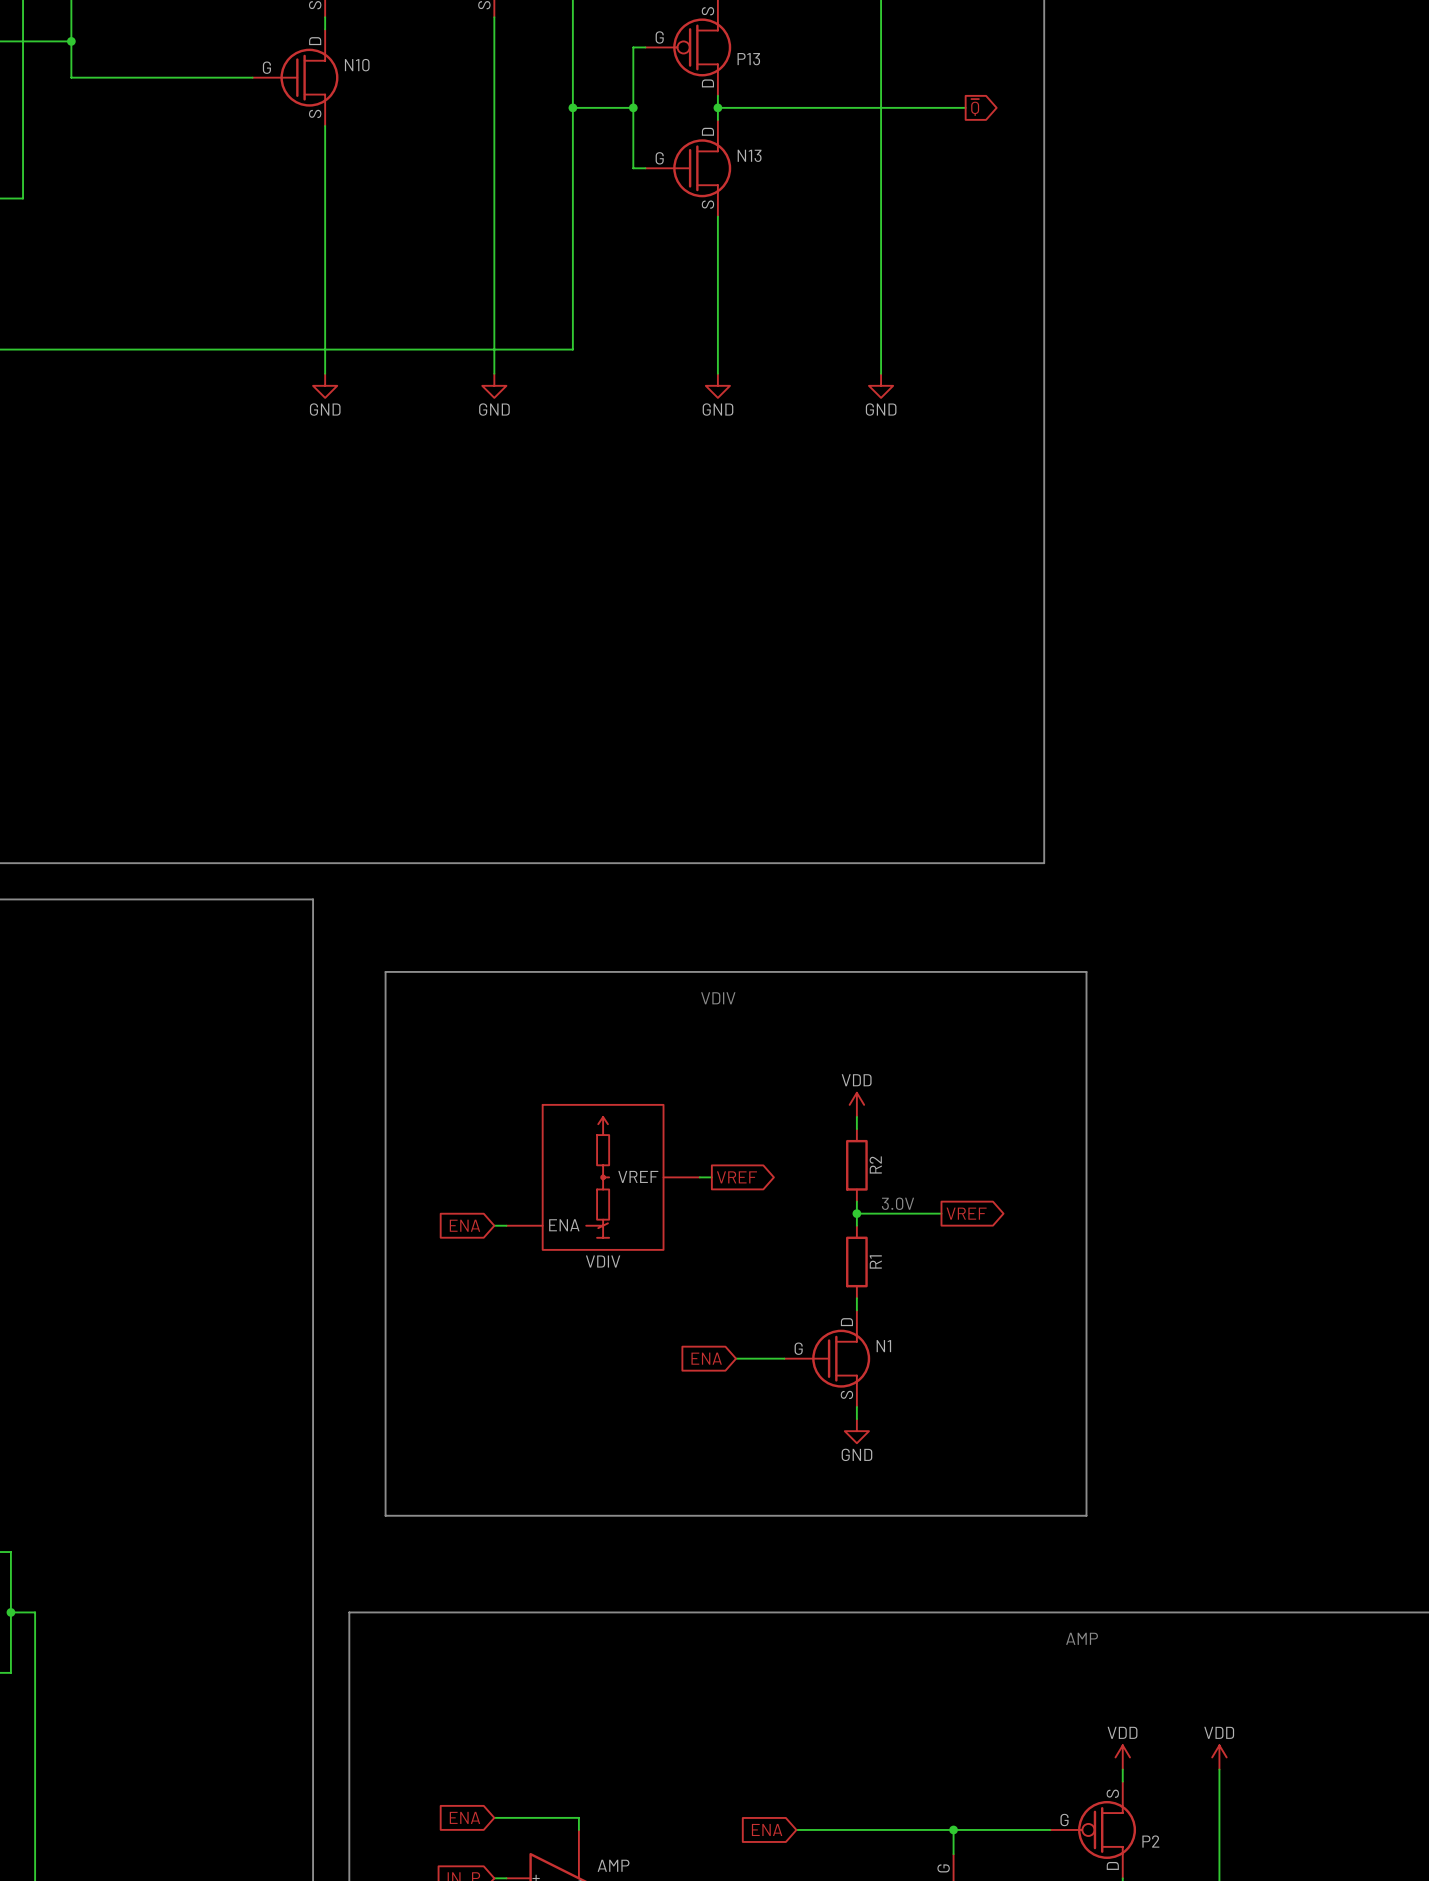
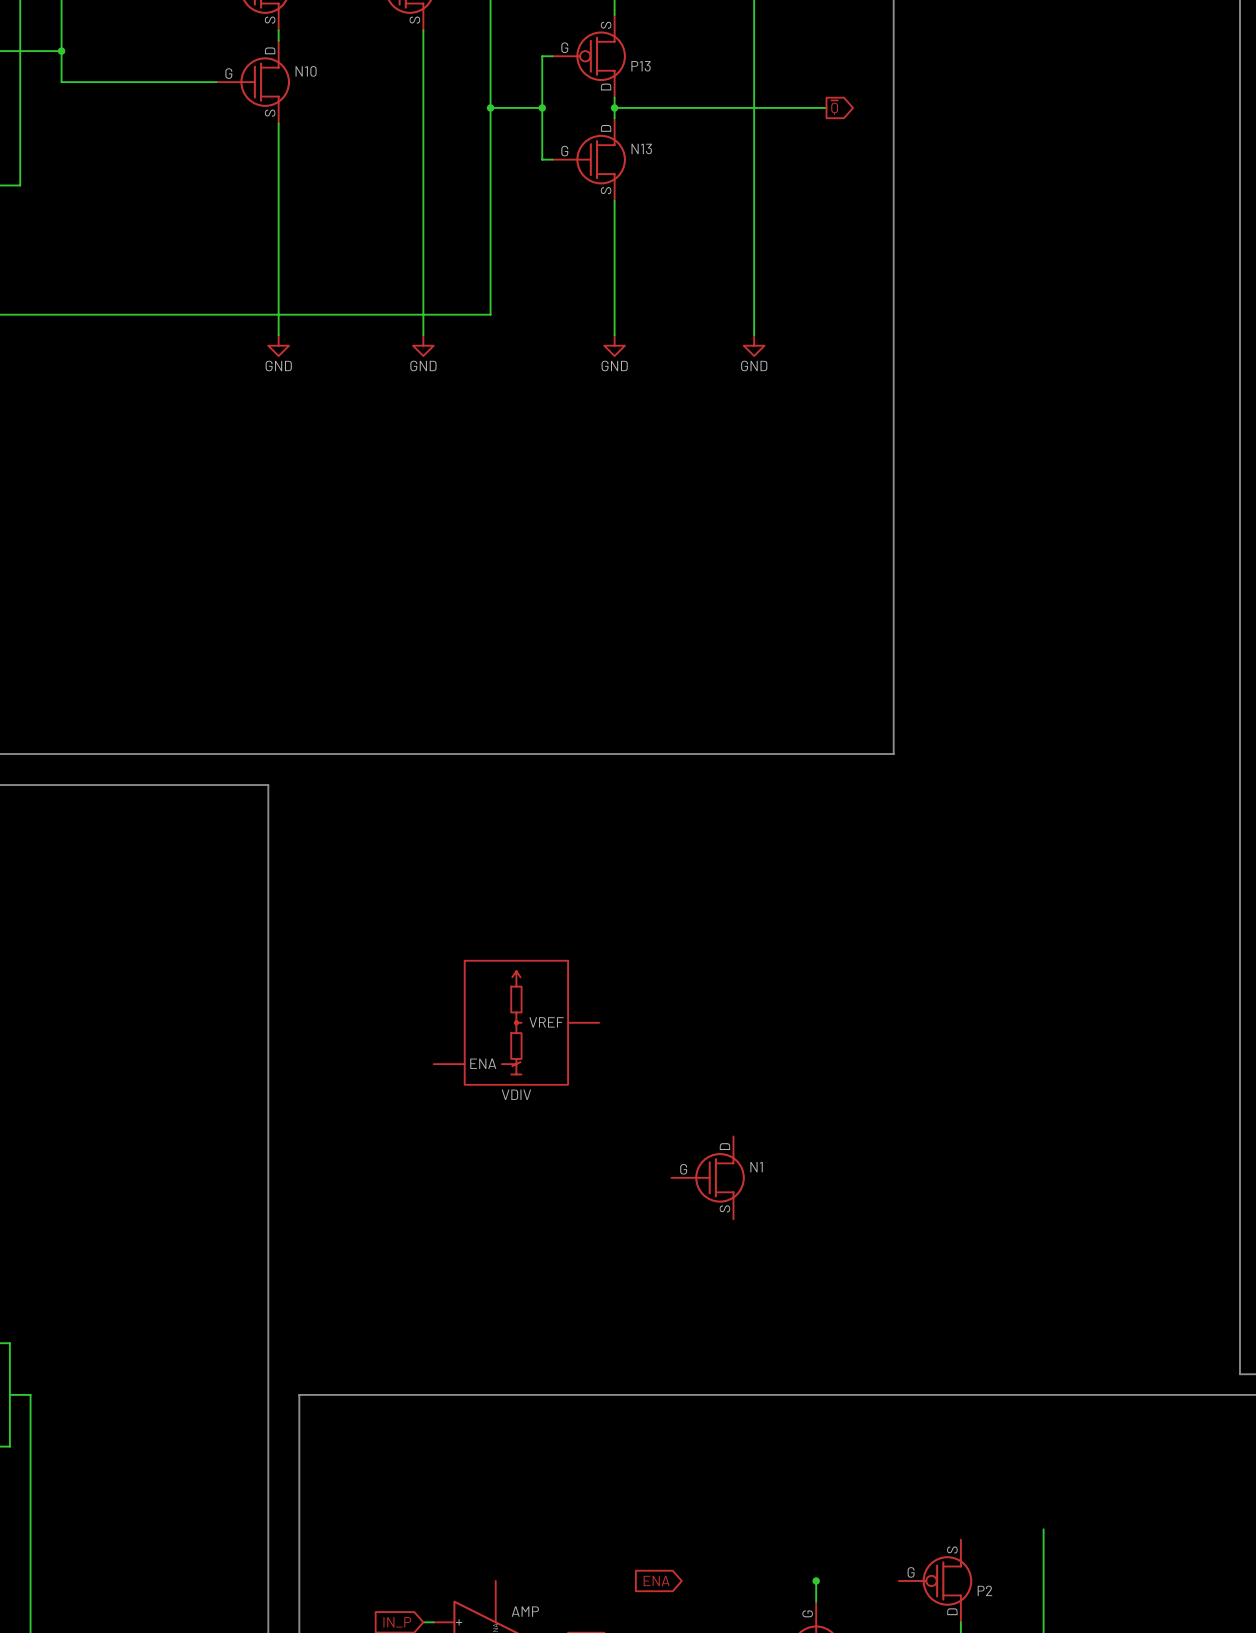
line: (385, 971) (1086, 971) (1086, 1515) (385, 1515) (385, 971) -> none
text: VDIV (718, 998) -> none
power symbol: VDD (856, 1104) -> none
wire: (856, 1116) (856, 1129) -> none
R2: (856, 1165) -> none
wire: (699, 1177) (711, 1177) -> none
global label: VREF (737, 1177) -> none
wire: (856, 1201) (856, 1225) -> none
text: 3.0V (898, 1203) -> none
wire: (856, 1213) (941, 1213) -> none
junction: (856, 1213) -> none
global label: VREF (966, 1213) -> none
global label: ENA (464, 1225) -> none
wire: (494, 1225) (506, 1225) -> none
R1: (856, 1261) -> none
wire: (856, 1298) (856, 1310) -> none
global label: ENA (706, 1358) -> none
wire: (736, 1358) (784, 1358) -> none
wire: (856, 1407) (856, 1419) -> none
power symbol: GND (856, 1431) -> none
junction: (10, 1612) -> none
text: AMP (1082, 1638) -> none
power symbol: VDD (1122, 1757) -> none
power symbol: VDD (1219, 1757) -> none
wire: (1122, 1769) (1122, 1781) -> none
global label: ENA (464, 1817) -> none
wire: (494, 1817) (578, 1817) (578, 1829) -> none
wire: (796, 1829) (1050, 1829) -> none

